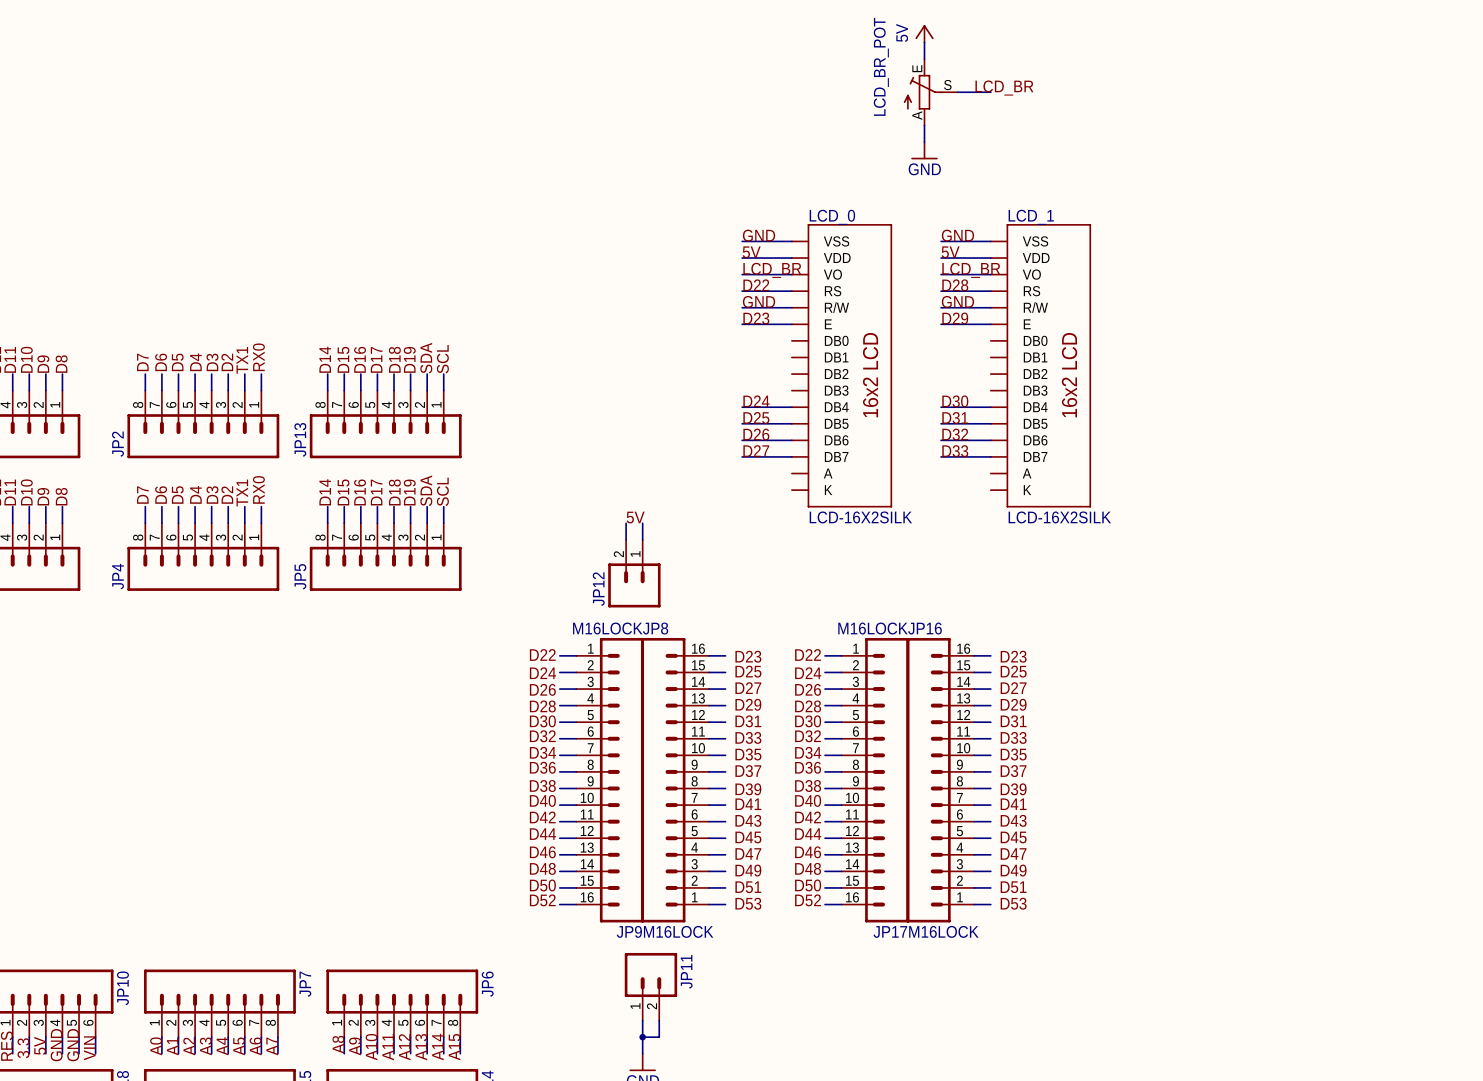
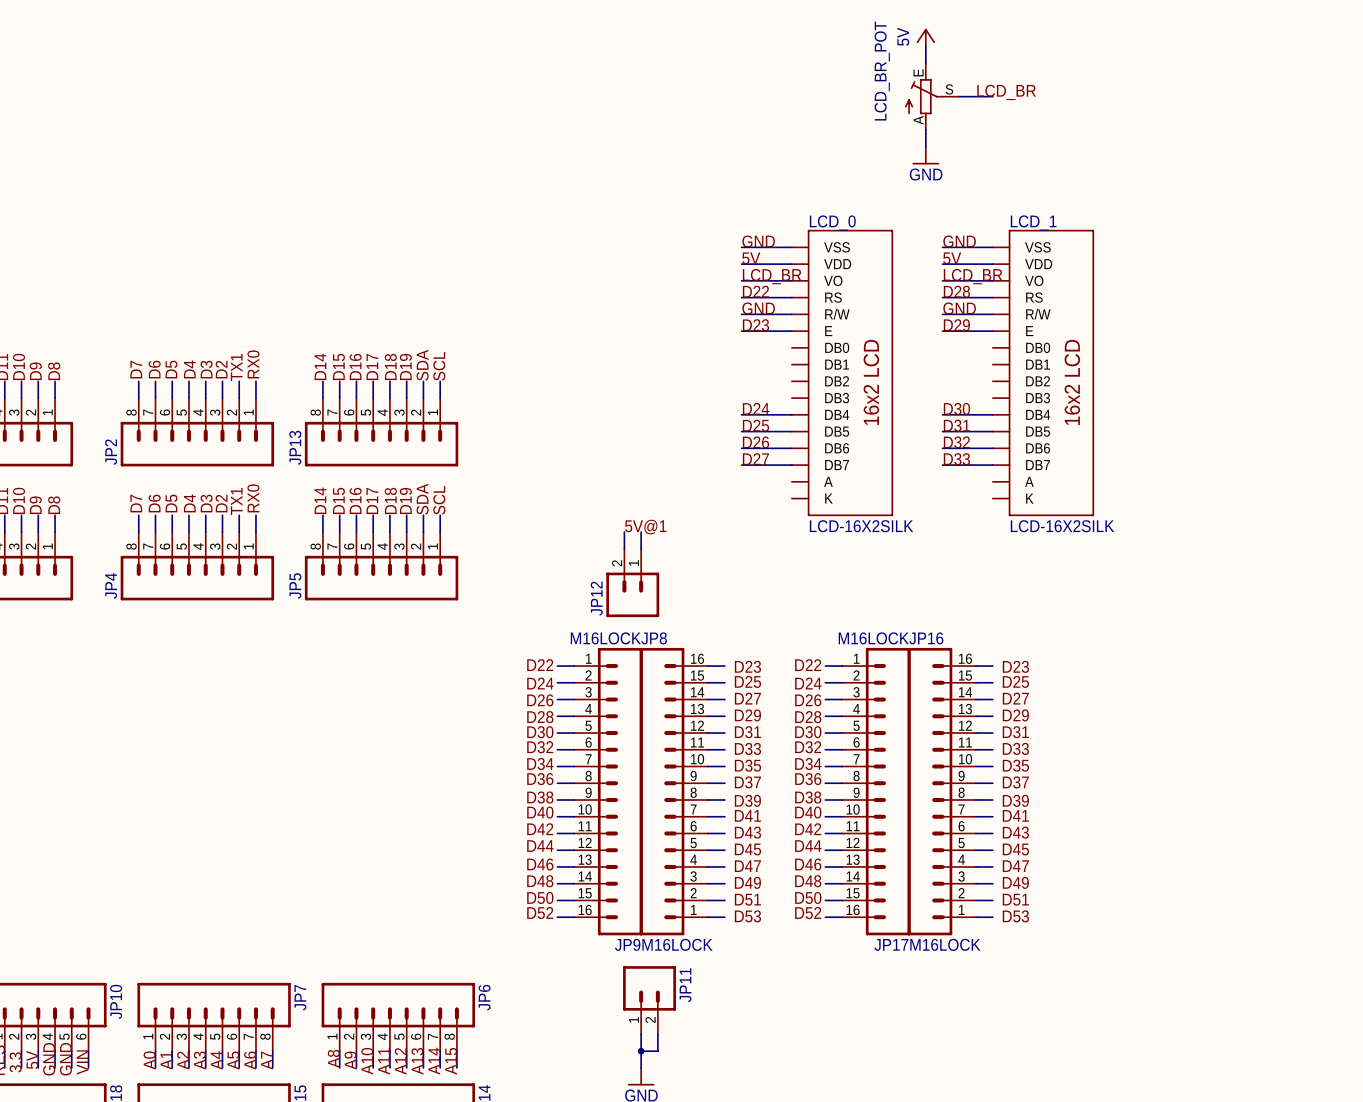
label: 5V (635, 517) -> 5V@1 (645, 527)

